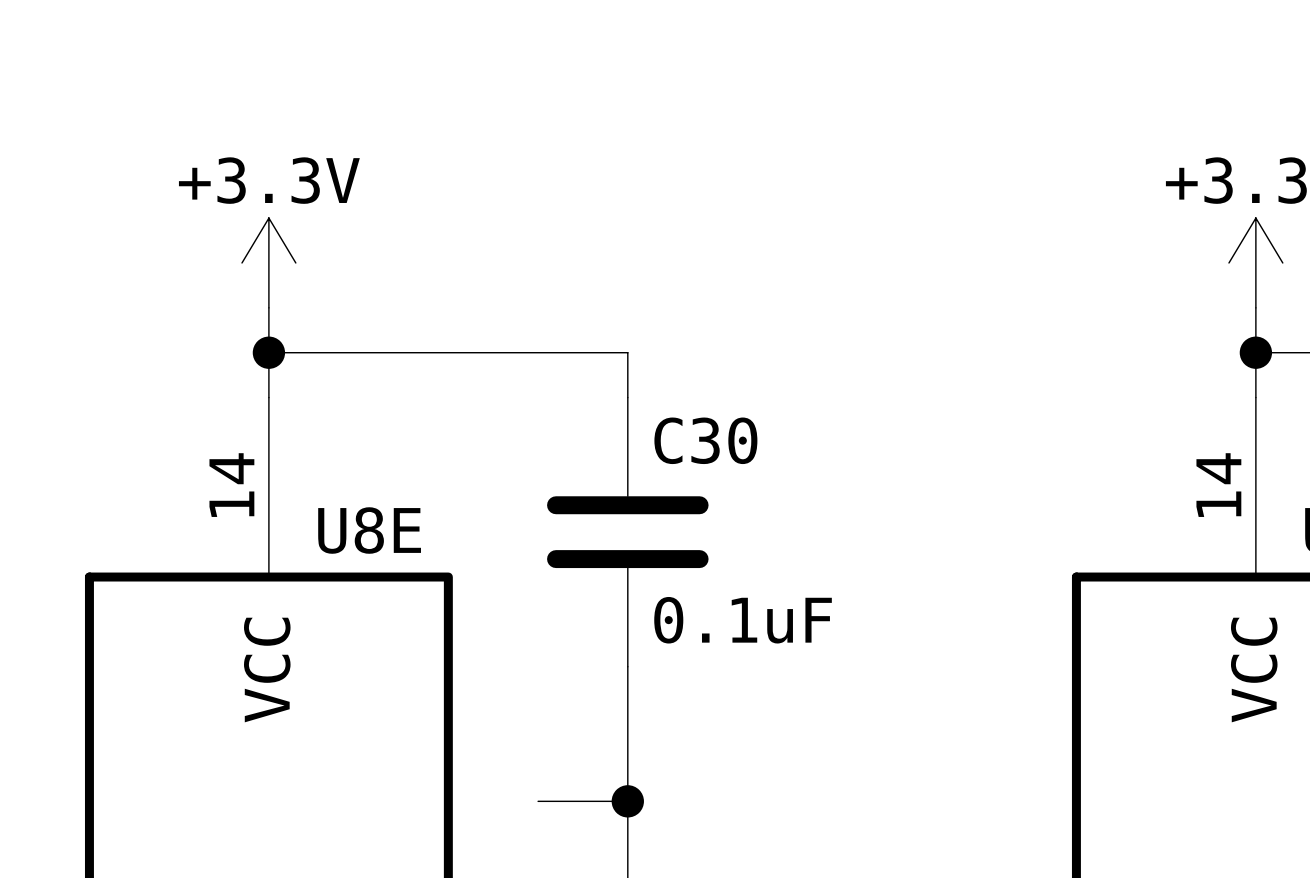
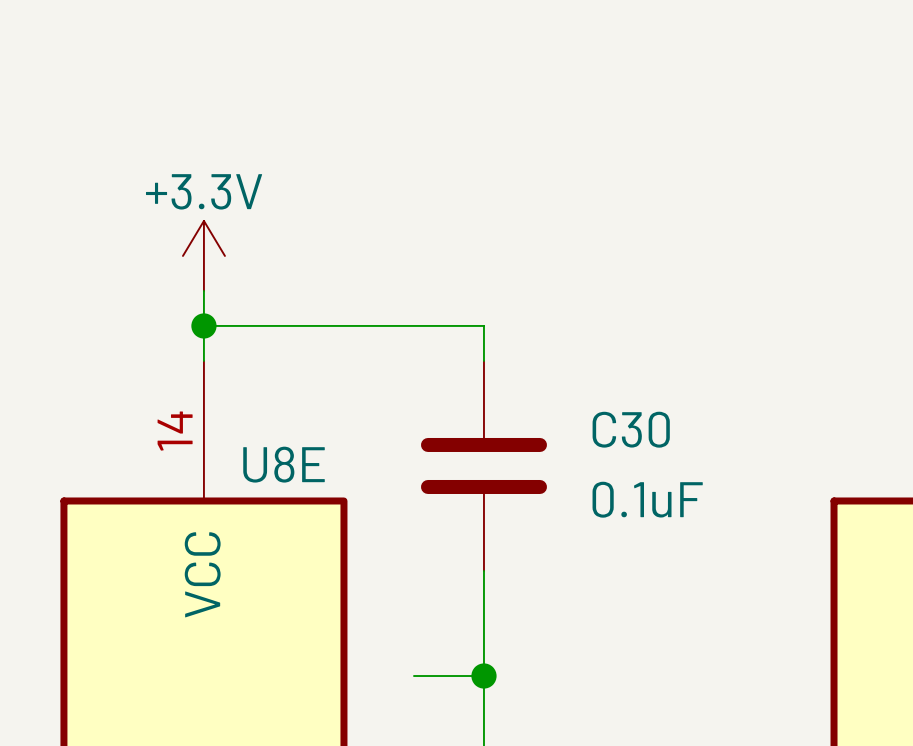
C30 name position: C30 (705, 440) -> C30 (631, 429)
C30 value position: 0.1uF (743, 620) -> 0.1uF (647, 499)

